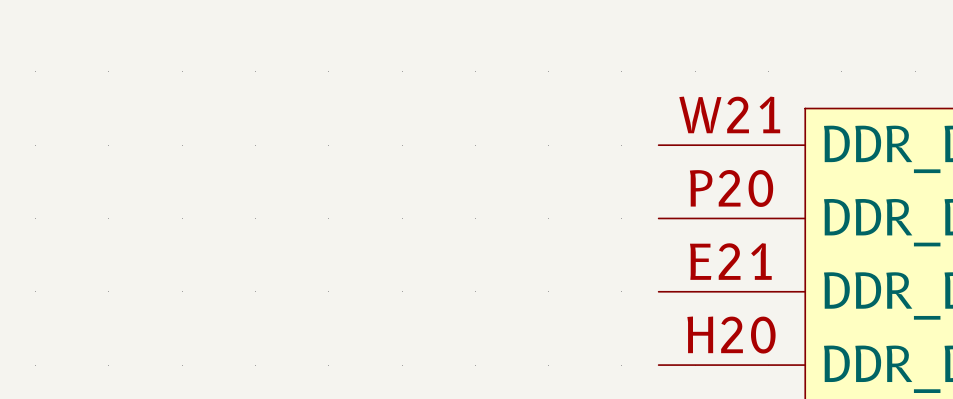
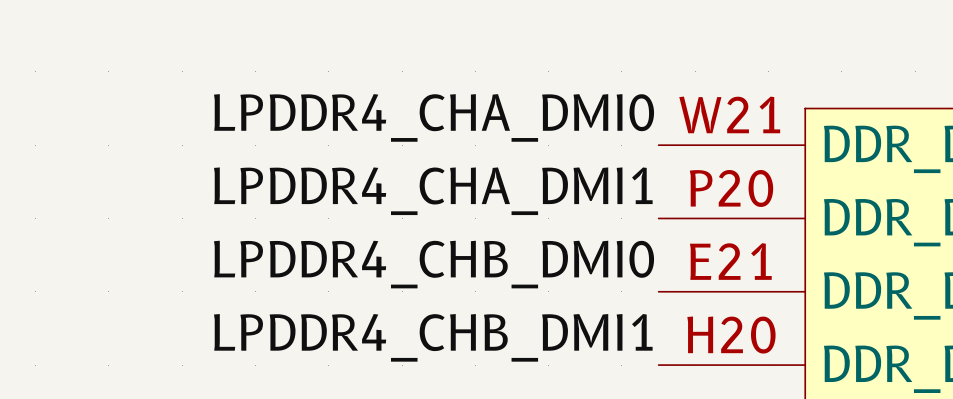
label: none -> LPDDR4_CHA_DMI0 (434, 117)
label: none -> LPDDR4_CHA_DMI1 (433, 191)
label: none -> LPDDR4_CHB_DMI0 (434, 264)
label: none -> LPDDR4_CHB_DMI1 (433, 337)

